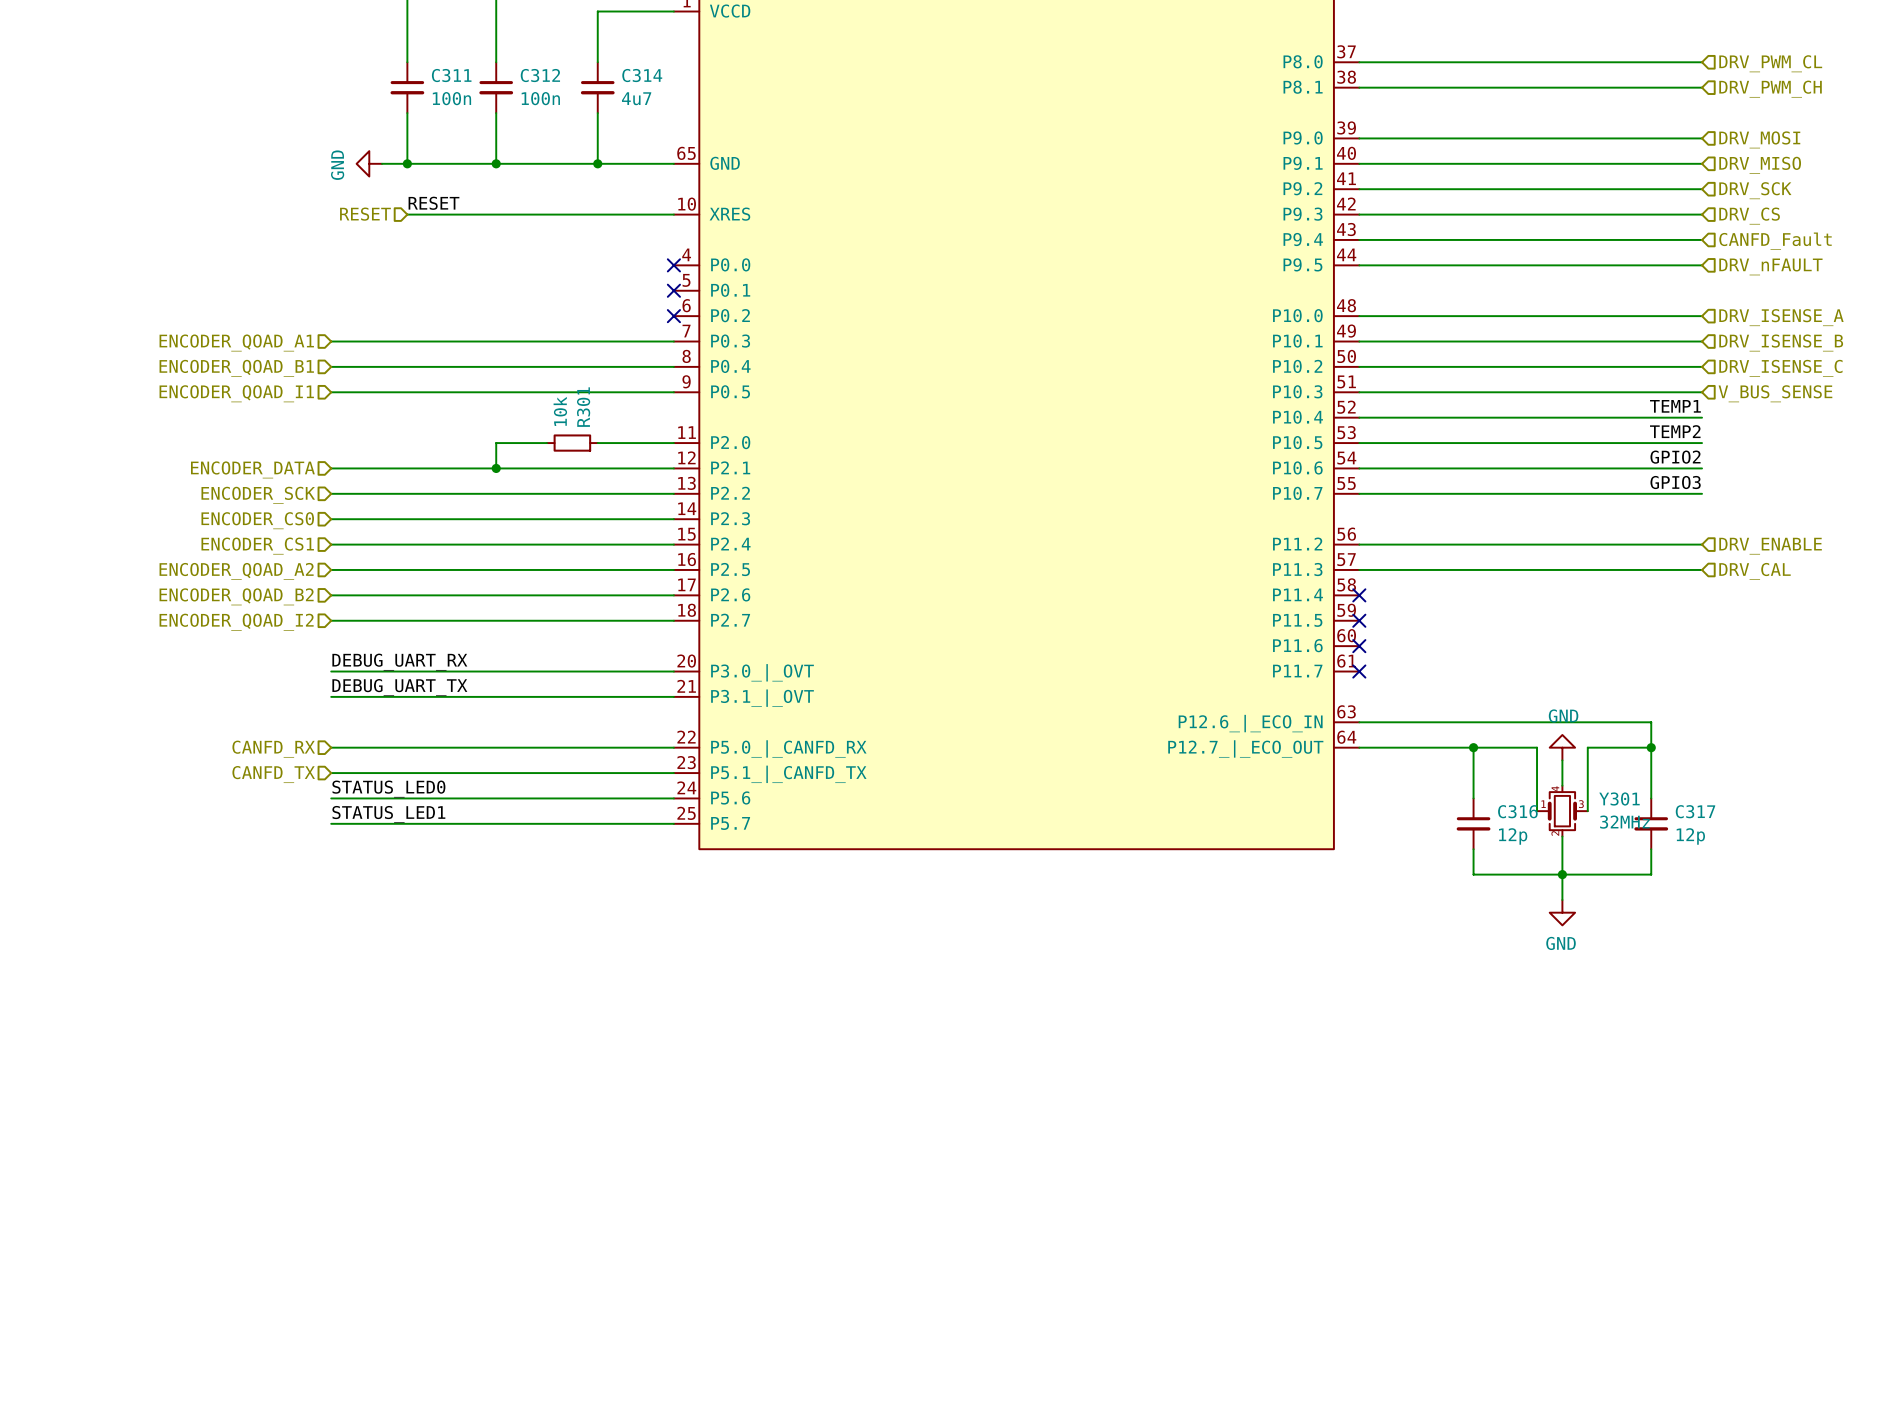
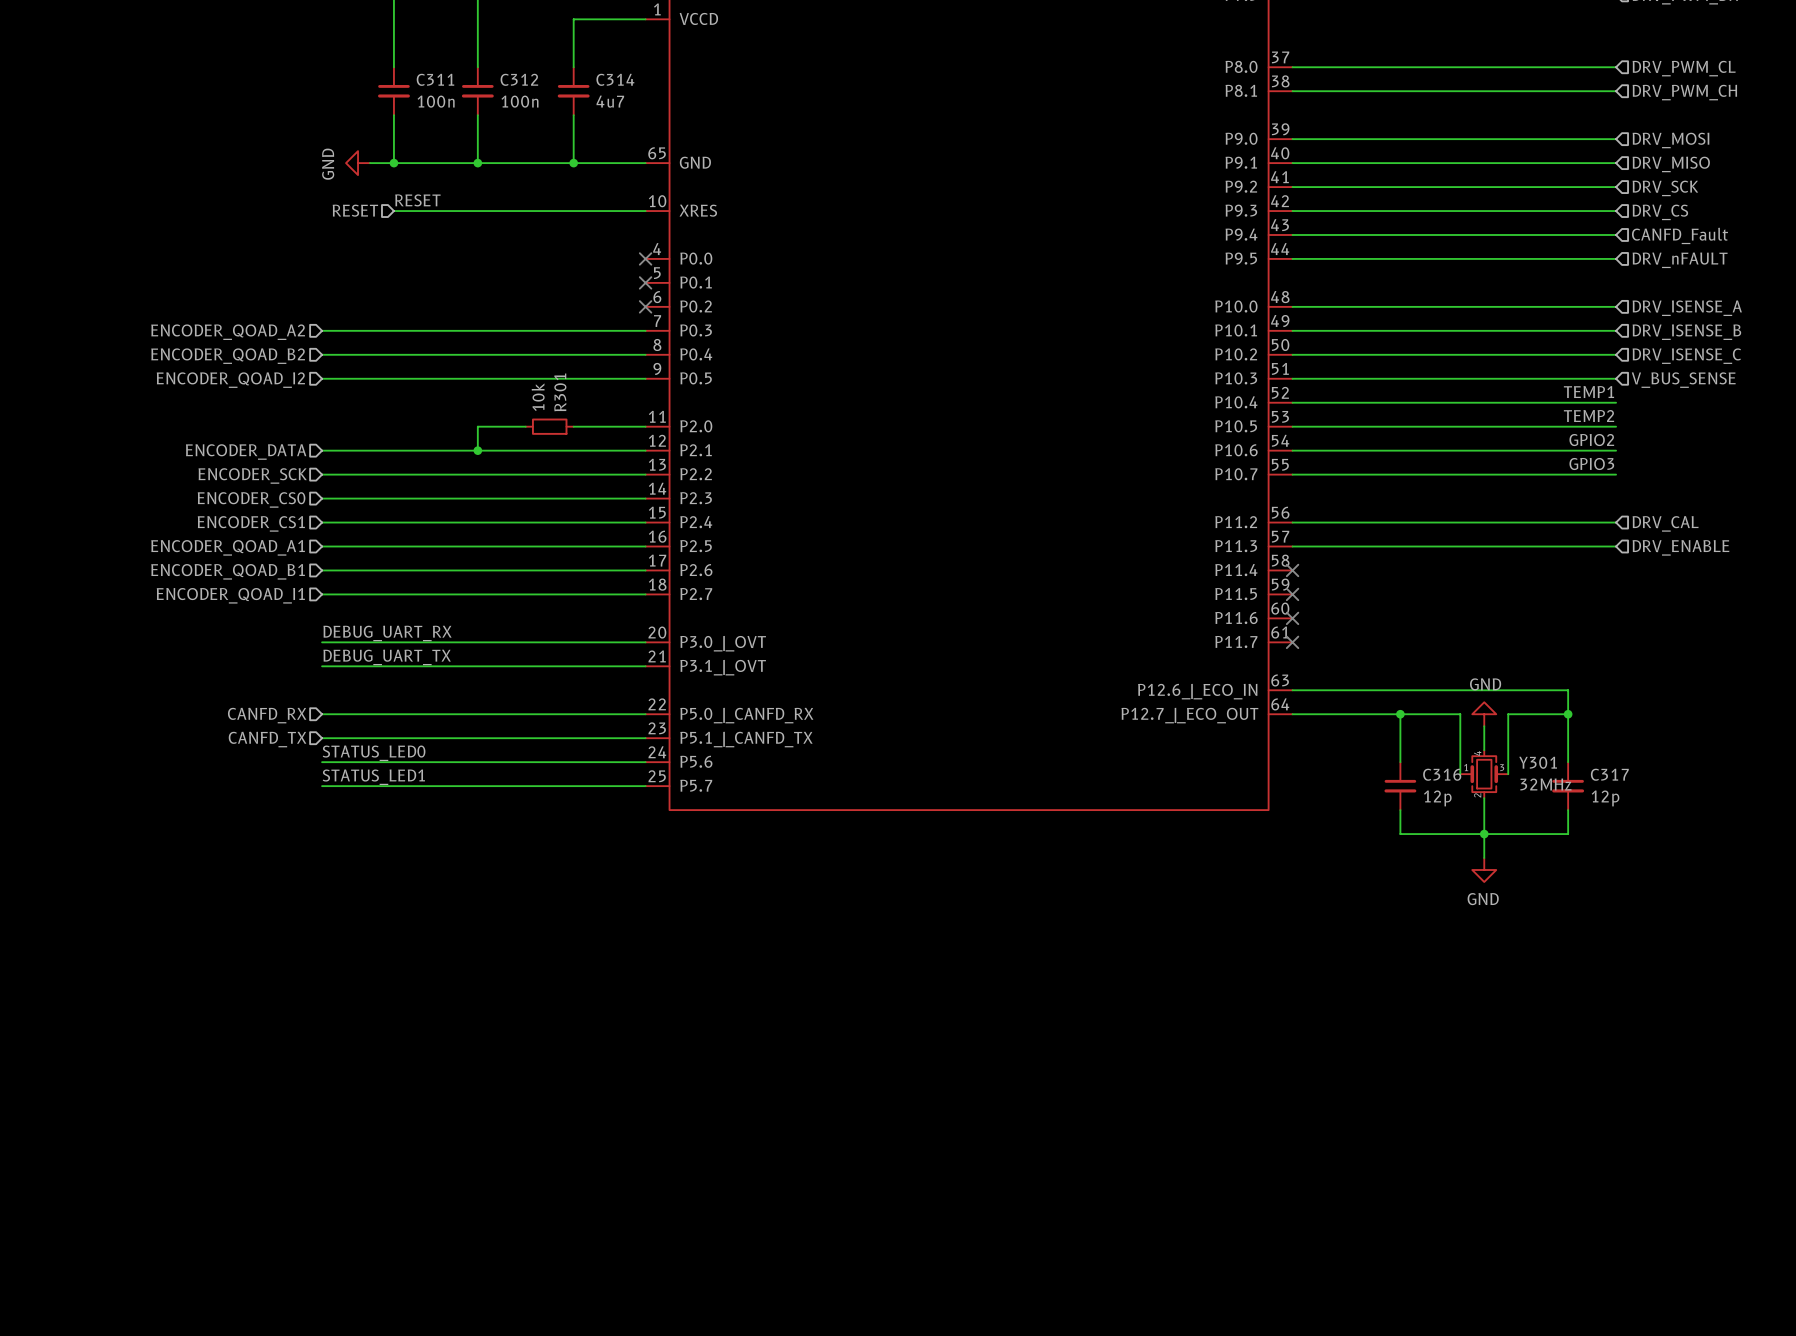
hierarchical label: ENCODER_QOAD_A1 (236, 342) -> ENCODER_QOAD_A2 (228, 332)
hierarchical label: ENCODER_QOAD_B1 (236, 368) -> ENCODER_QOAD_B2 (228, 356)
hierarchical label: ENCODER_QOAD_I1 (236, 393) -> ENCODER_QOAD_I2 (230, 380)
hierarchical label: DRV_ENABLE (1770, 546) -> DRV_CAL (1665, 523)
hierarchical label: ENCODER_QOAD_A2 (236, 571) -> ENCODER_QOAD_A1 (228, 547)
hierarchical label: DRV_CAL (1755, 571) -> DRV_ENABLE (1680, 547)
hierarchical label: ENCODER_QOAD_B2 (236, 596) -> ENCODER_QOAD_B1 (228, 571)
hierarchical label: ENCODER_QOAD_I2 (236, 622) -> ENCODER_QOAD_I1 (230, 595)

